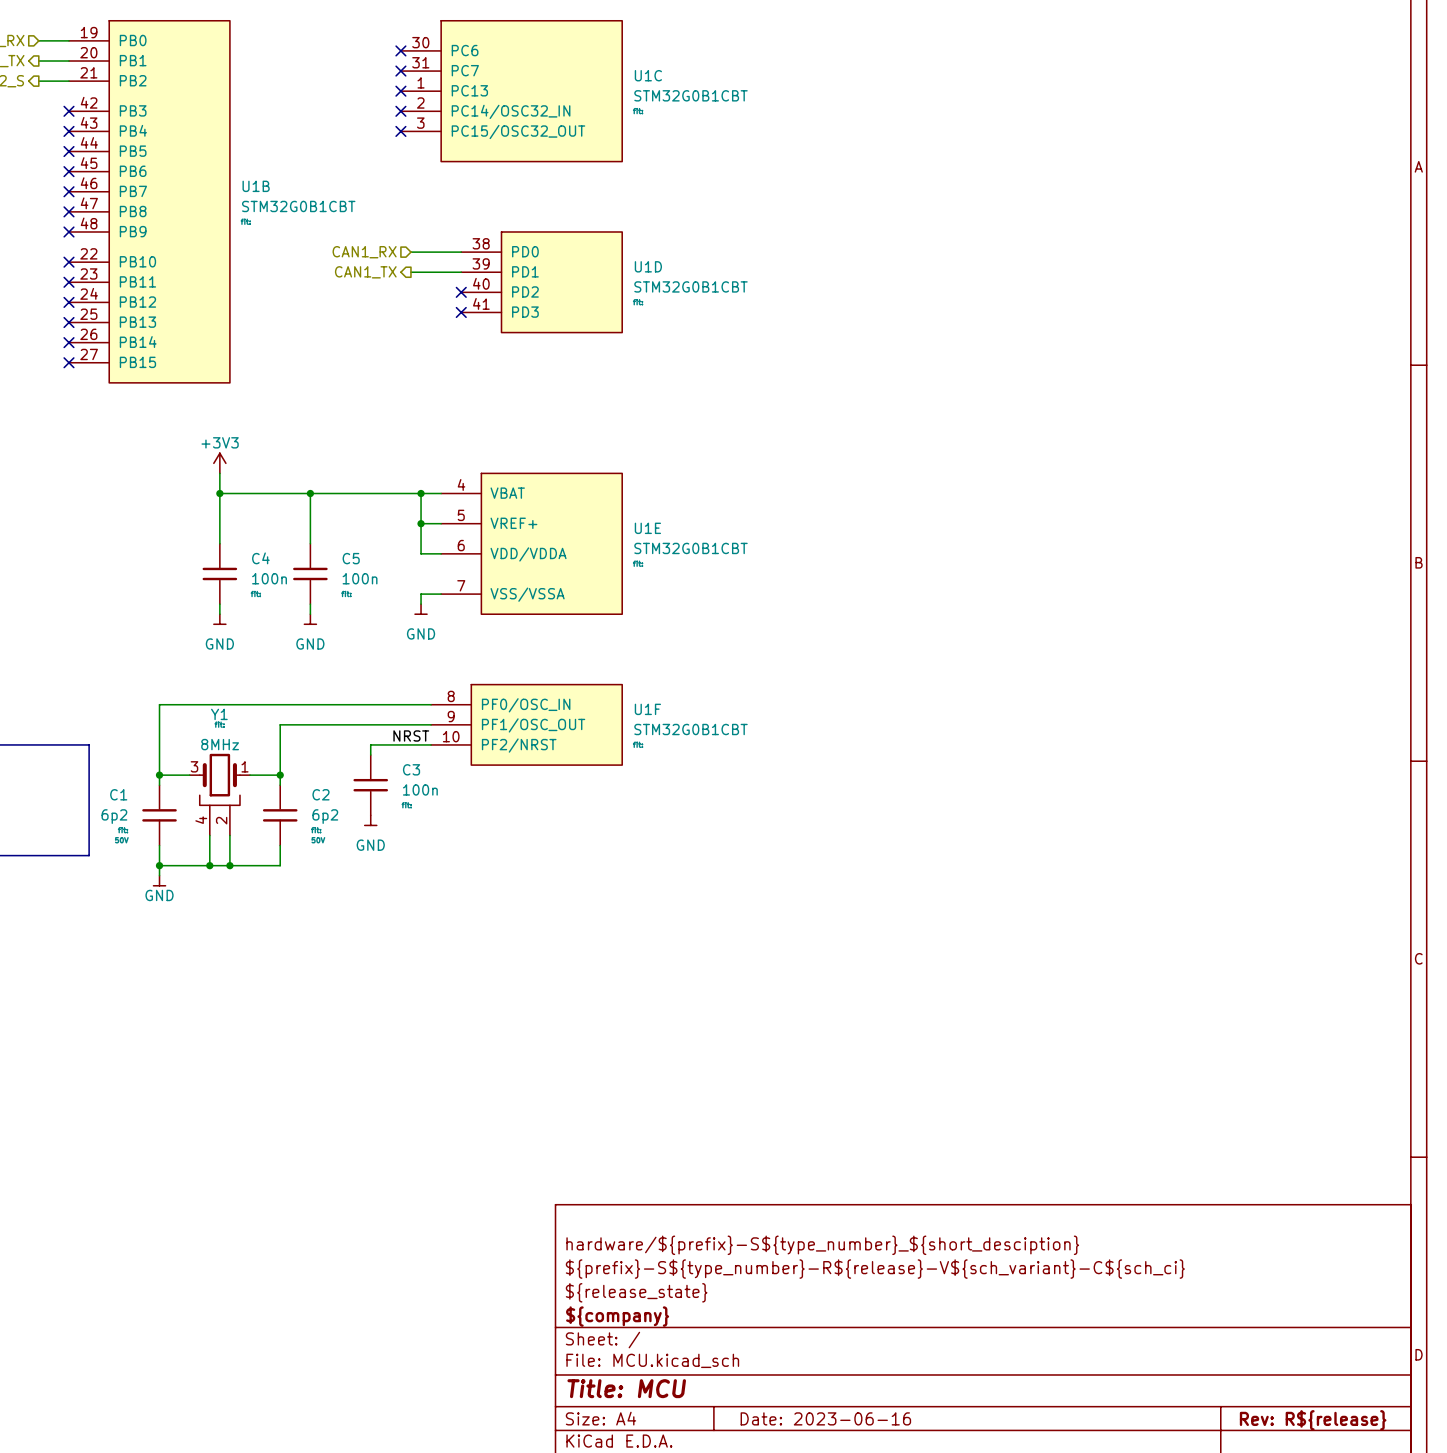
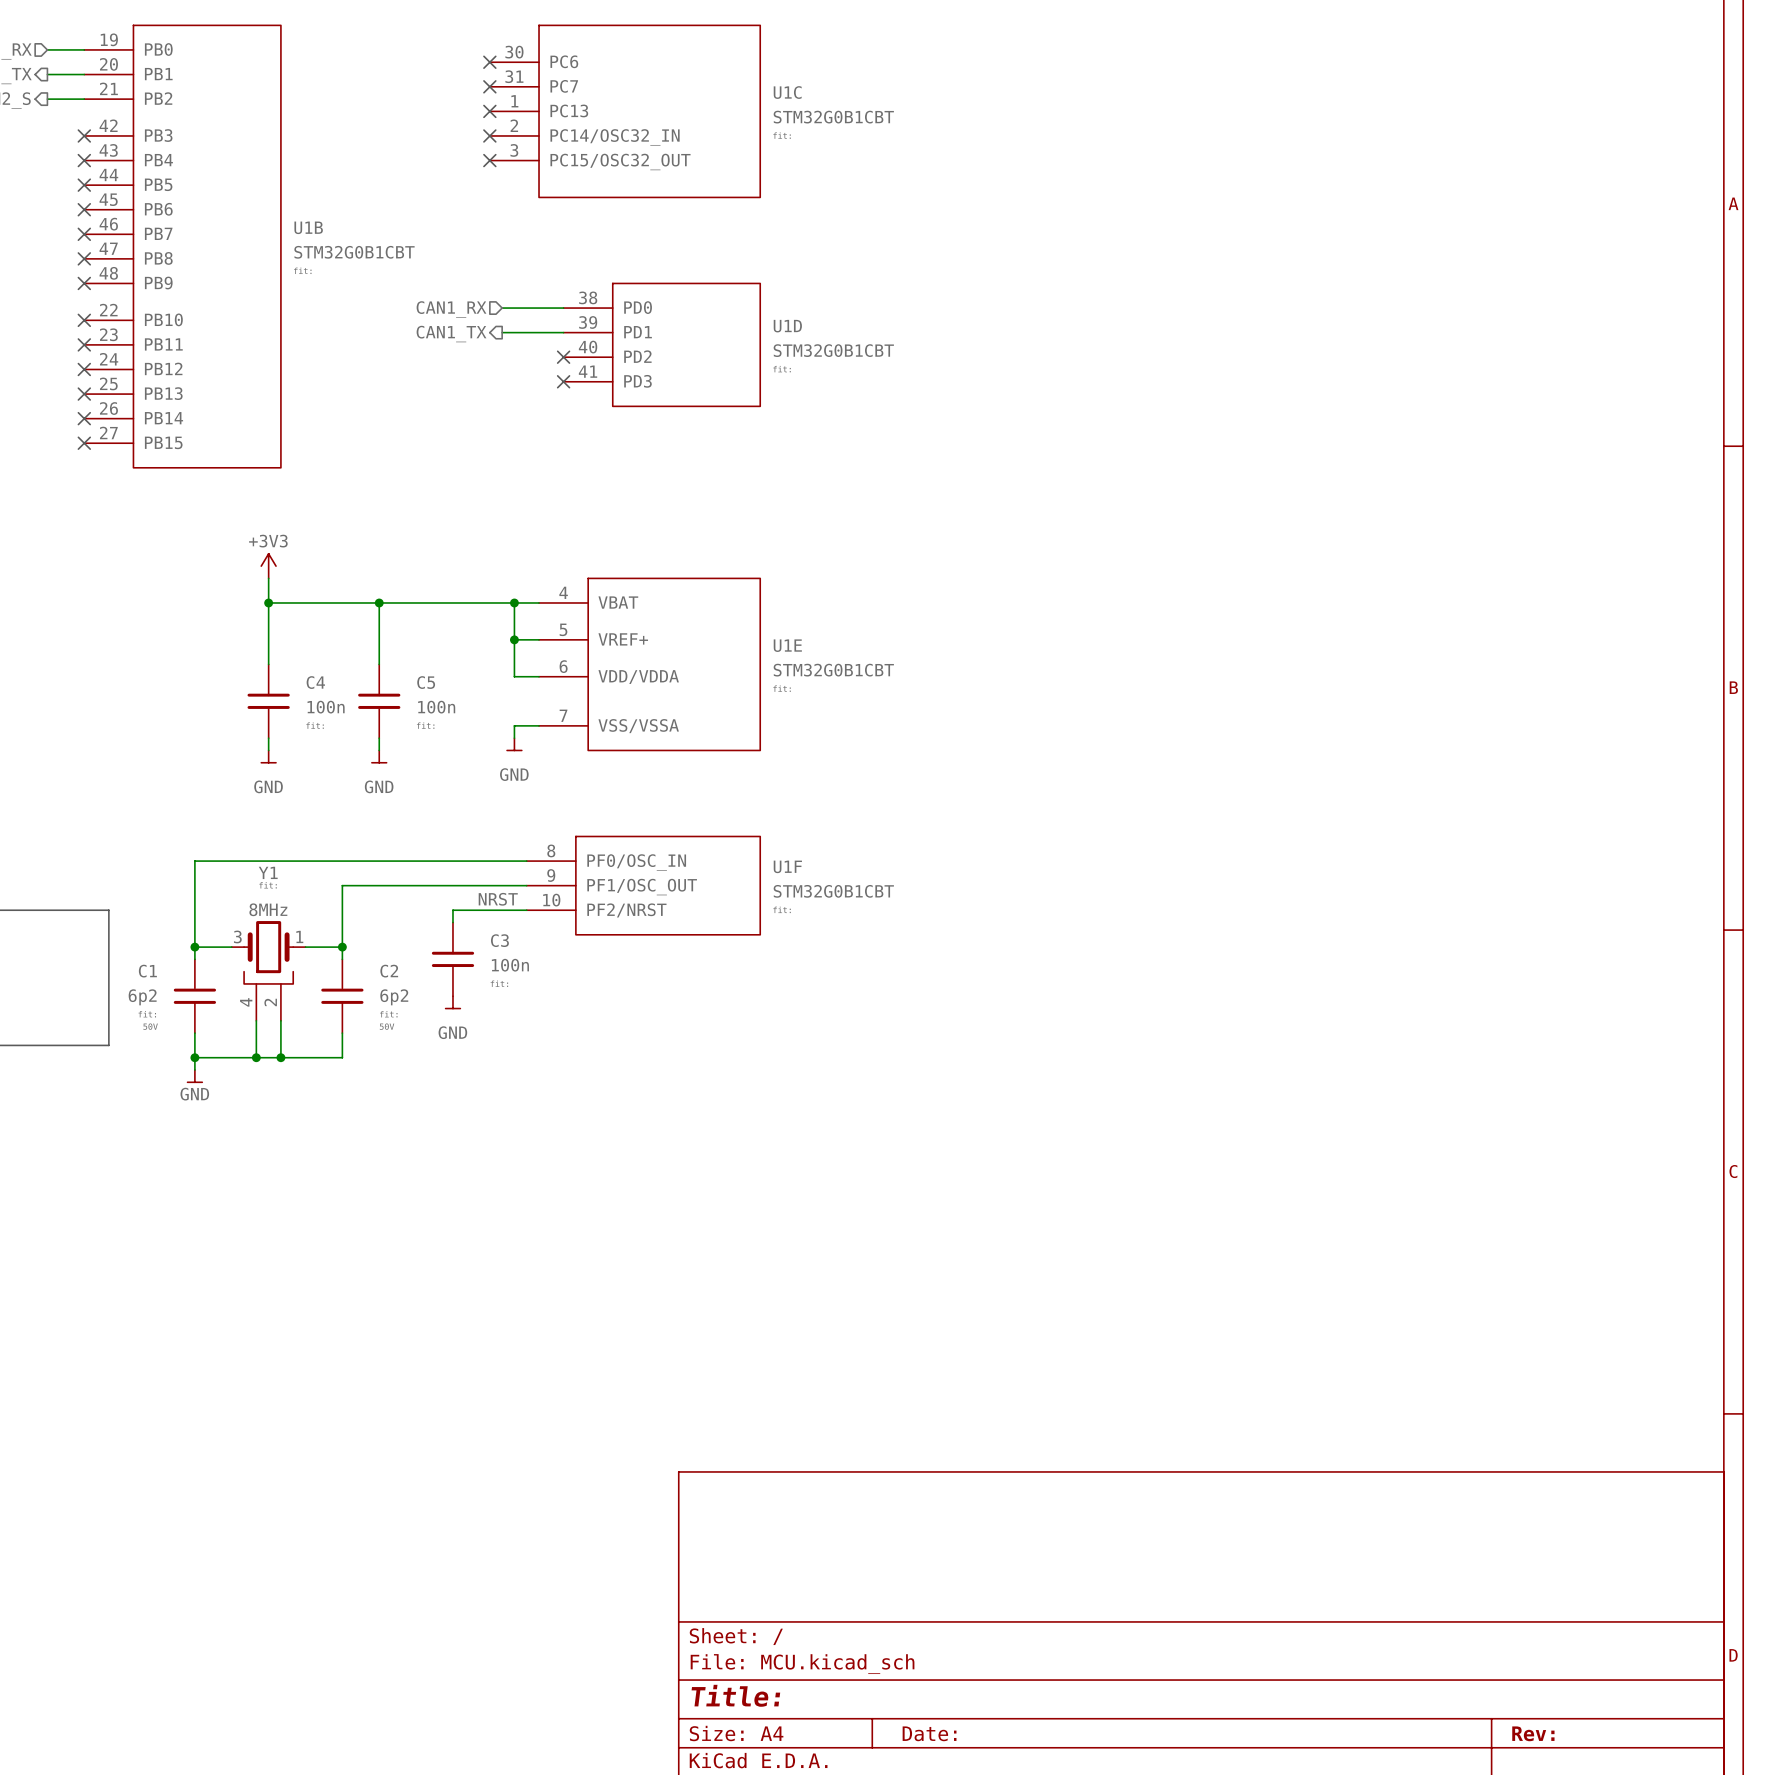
title block: hardware/${prefix}-S${type_number}_${short_desciption} (822, 1245) -> none
title block: ${prefix}-S${type_number}-R${release}-V${sch_variant}-C${sch_ci} (875, 1269) -> none
title block: ${release_state} (636, 1292) -> none
title block: ${company} (617, 1316) -> none
title block: Title: MCU (626, 1388) -> Title: (735, 1695)
title block: Date: 2023-06-16 (825, 1418) -> Date: (929, 1733)
title block: Rev: R${release} (1313, 1420) -> Rev: (1533, 1733)

